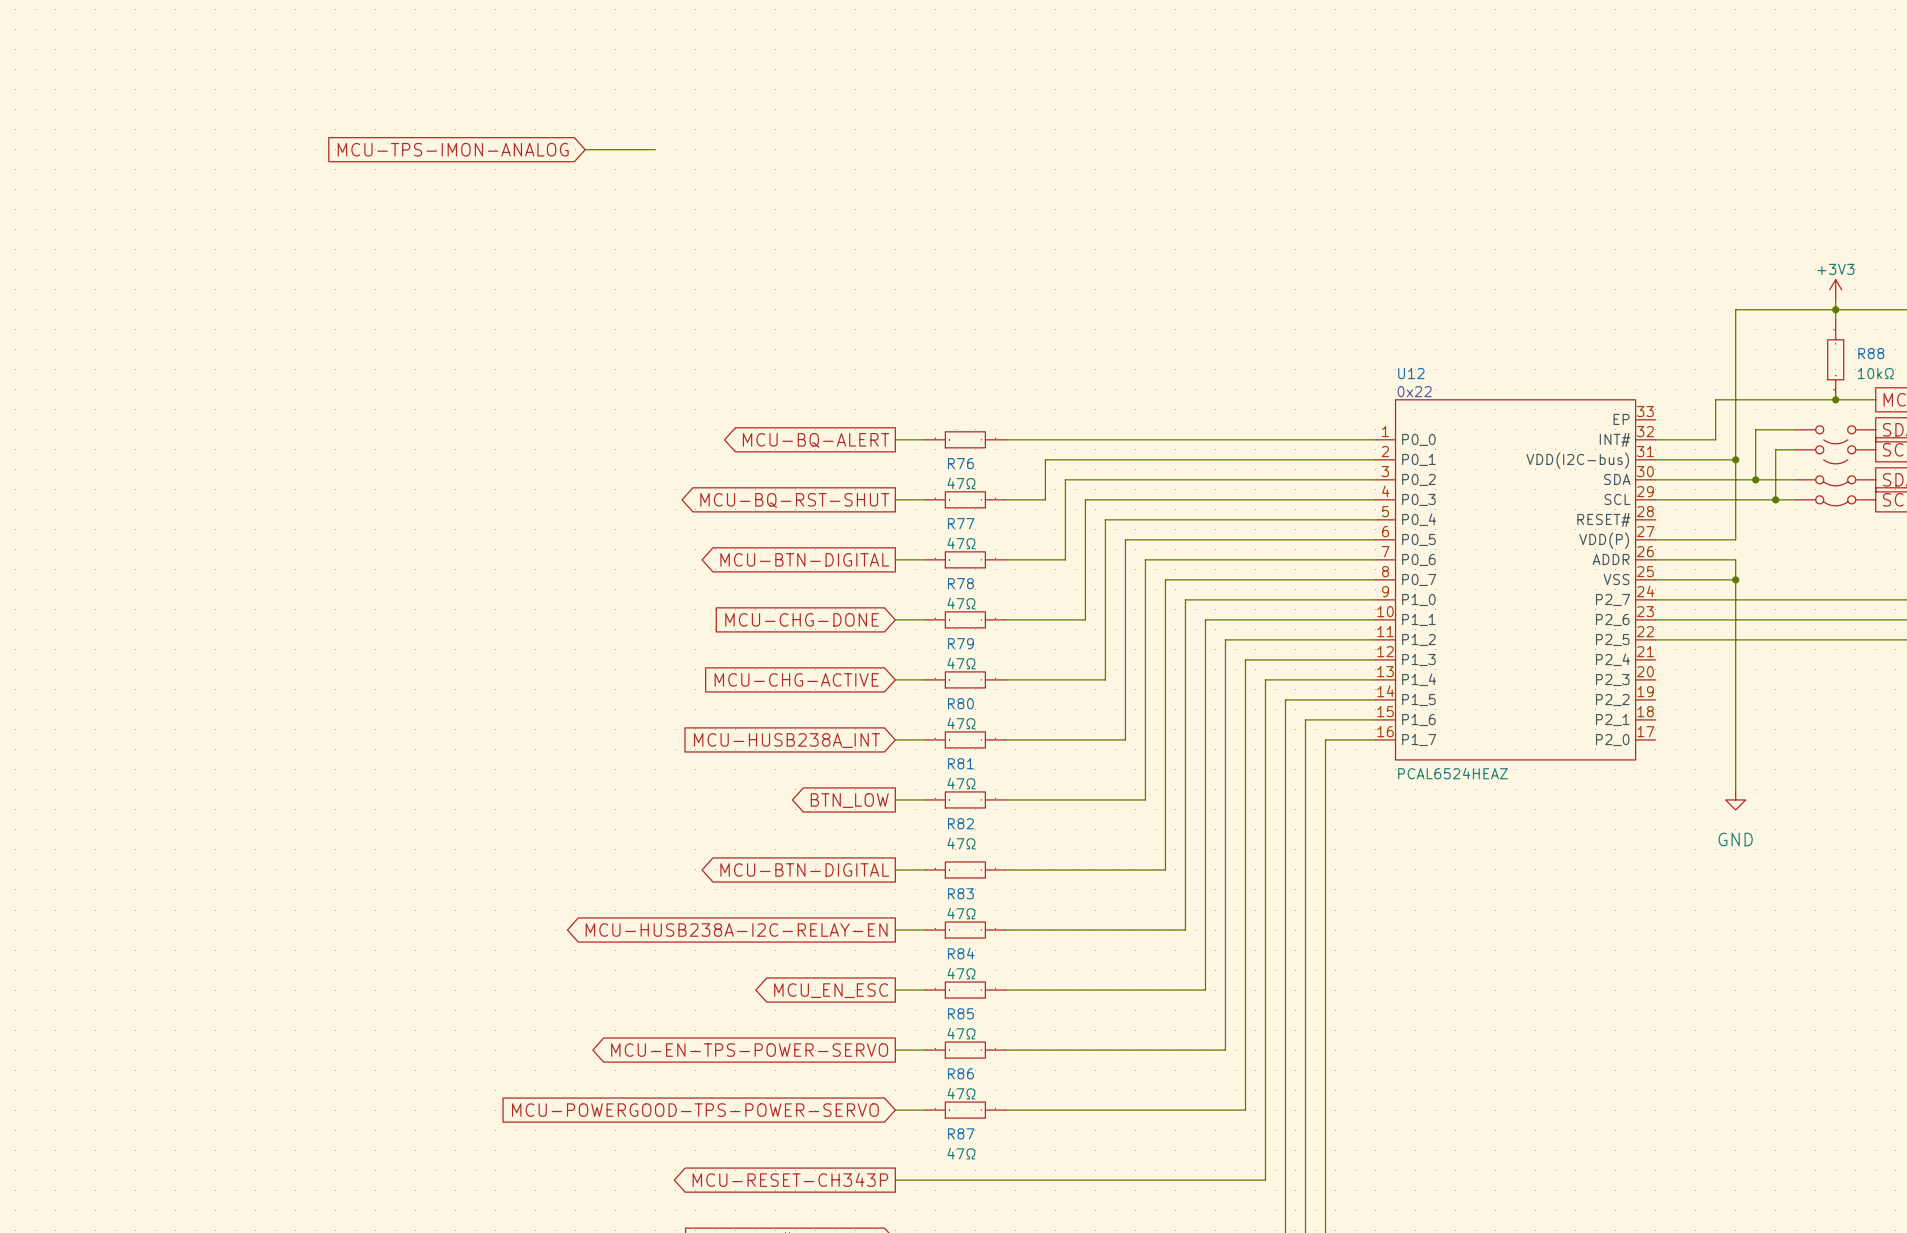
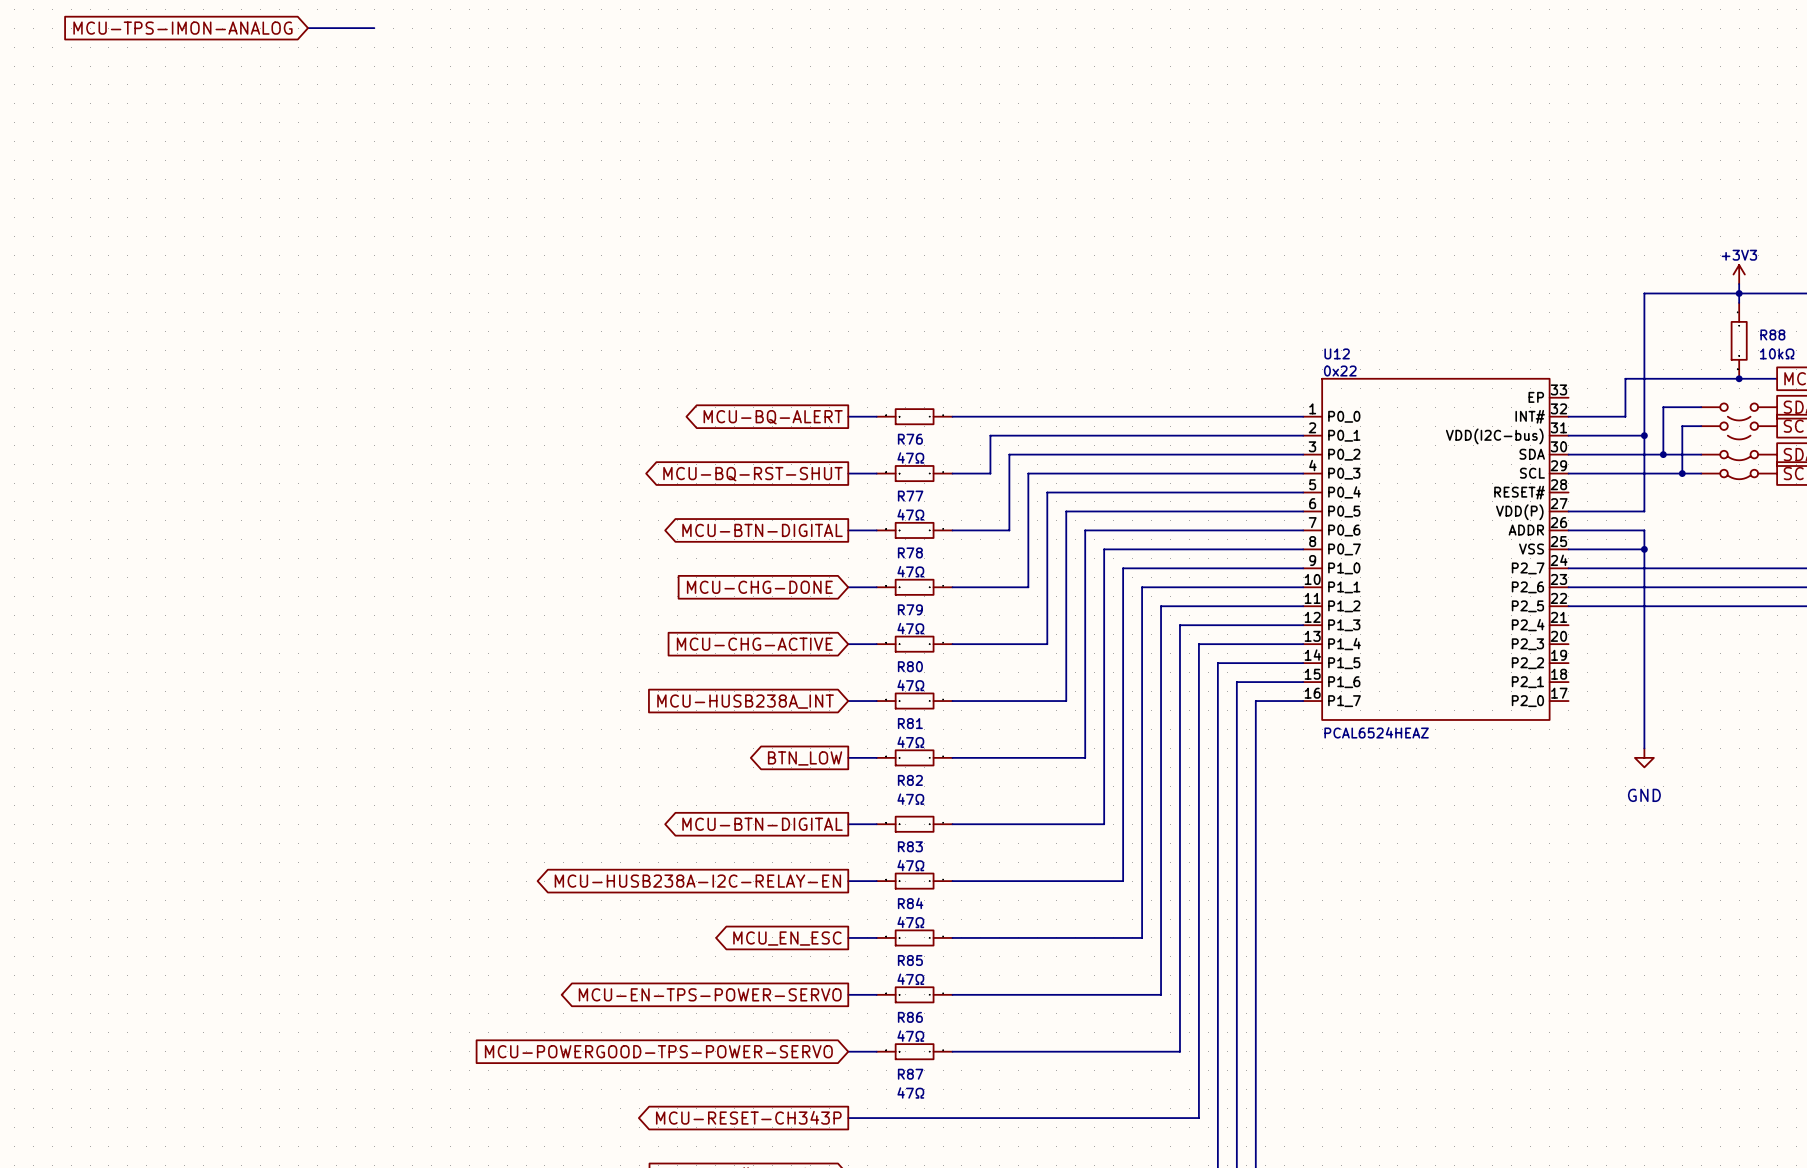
global label: none -> MCU-TPS-IMON-ANALOG (182, 28)
wire: none -> (308, 28) (374, 28)
global label: MCU-TPS-IMON-ANALOG (453, 149) -> none
wire: (585, 149) (655, 149) -> none

